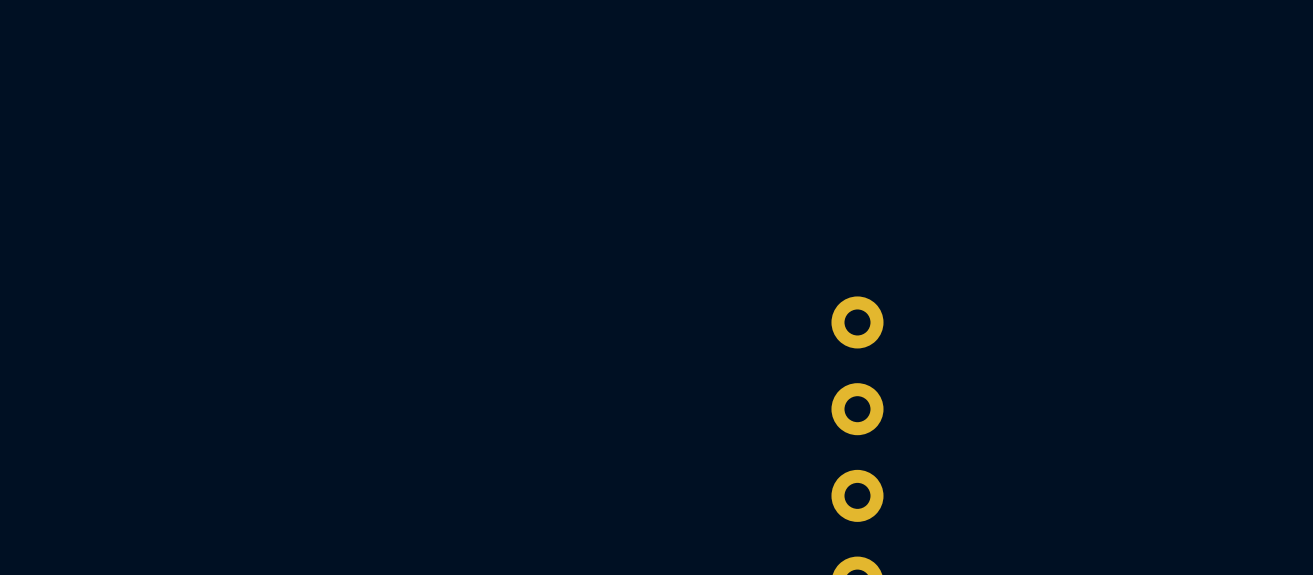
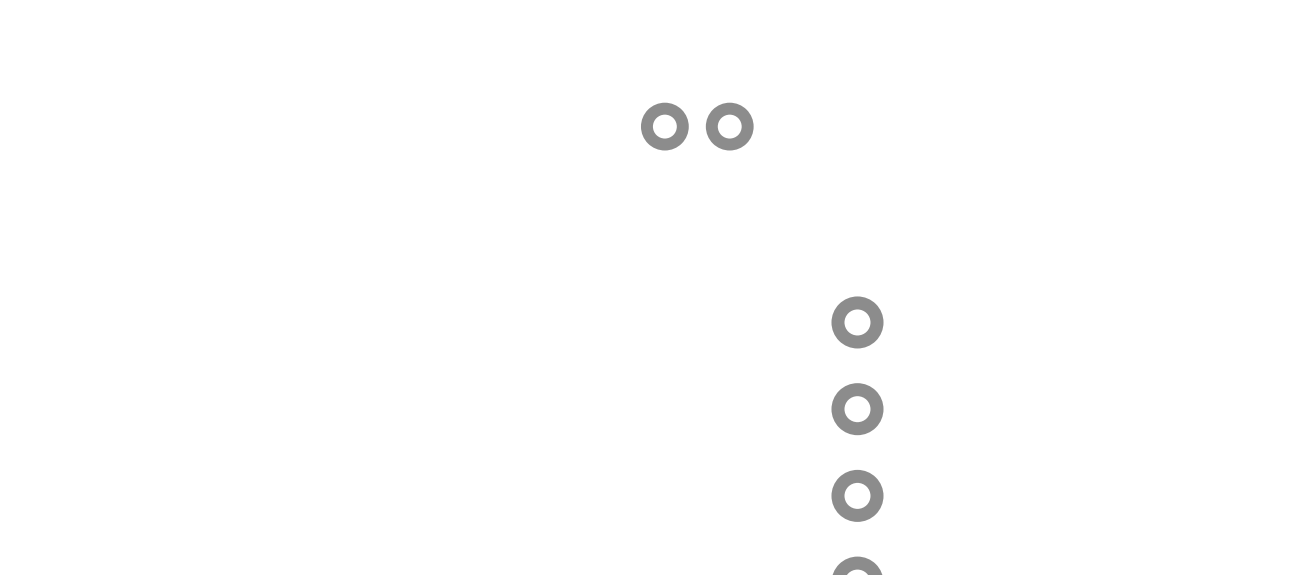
part: none -> (697, 126)

